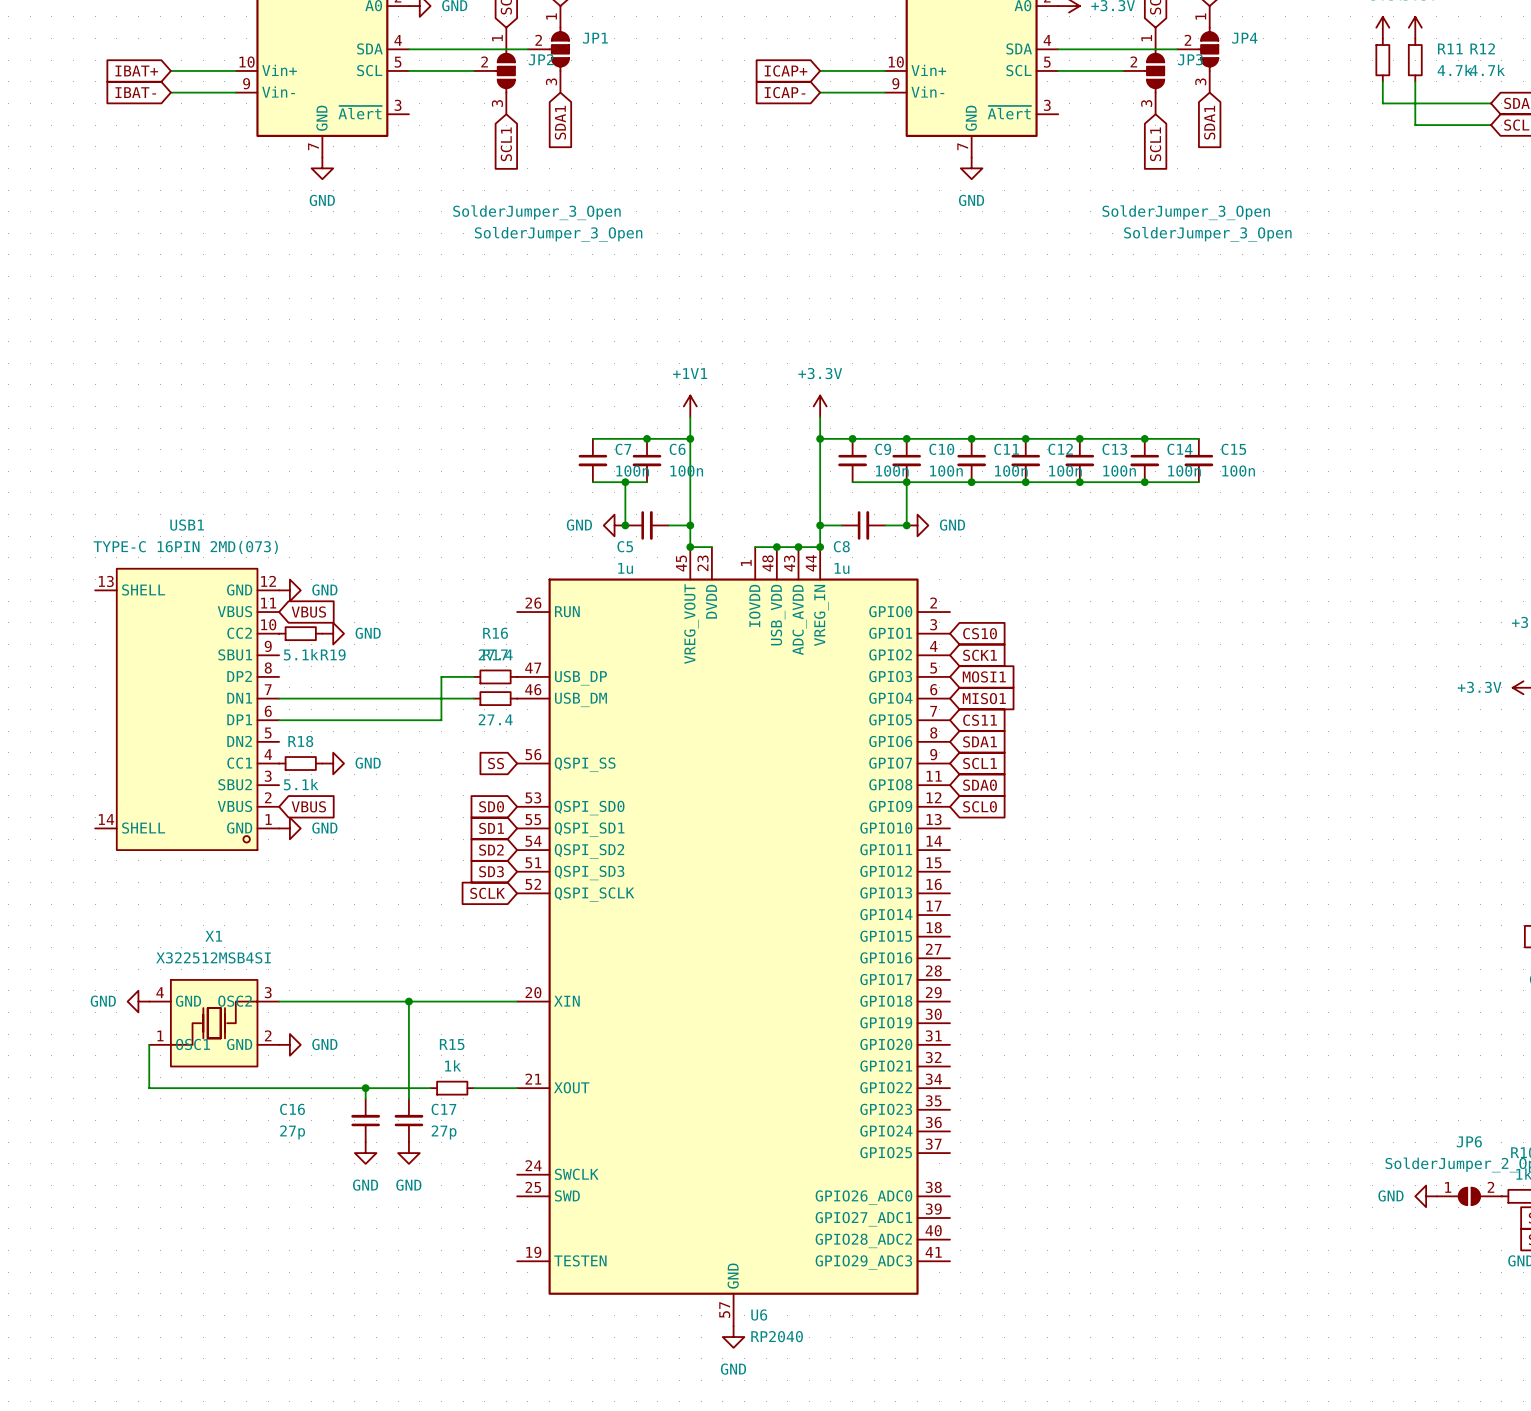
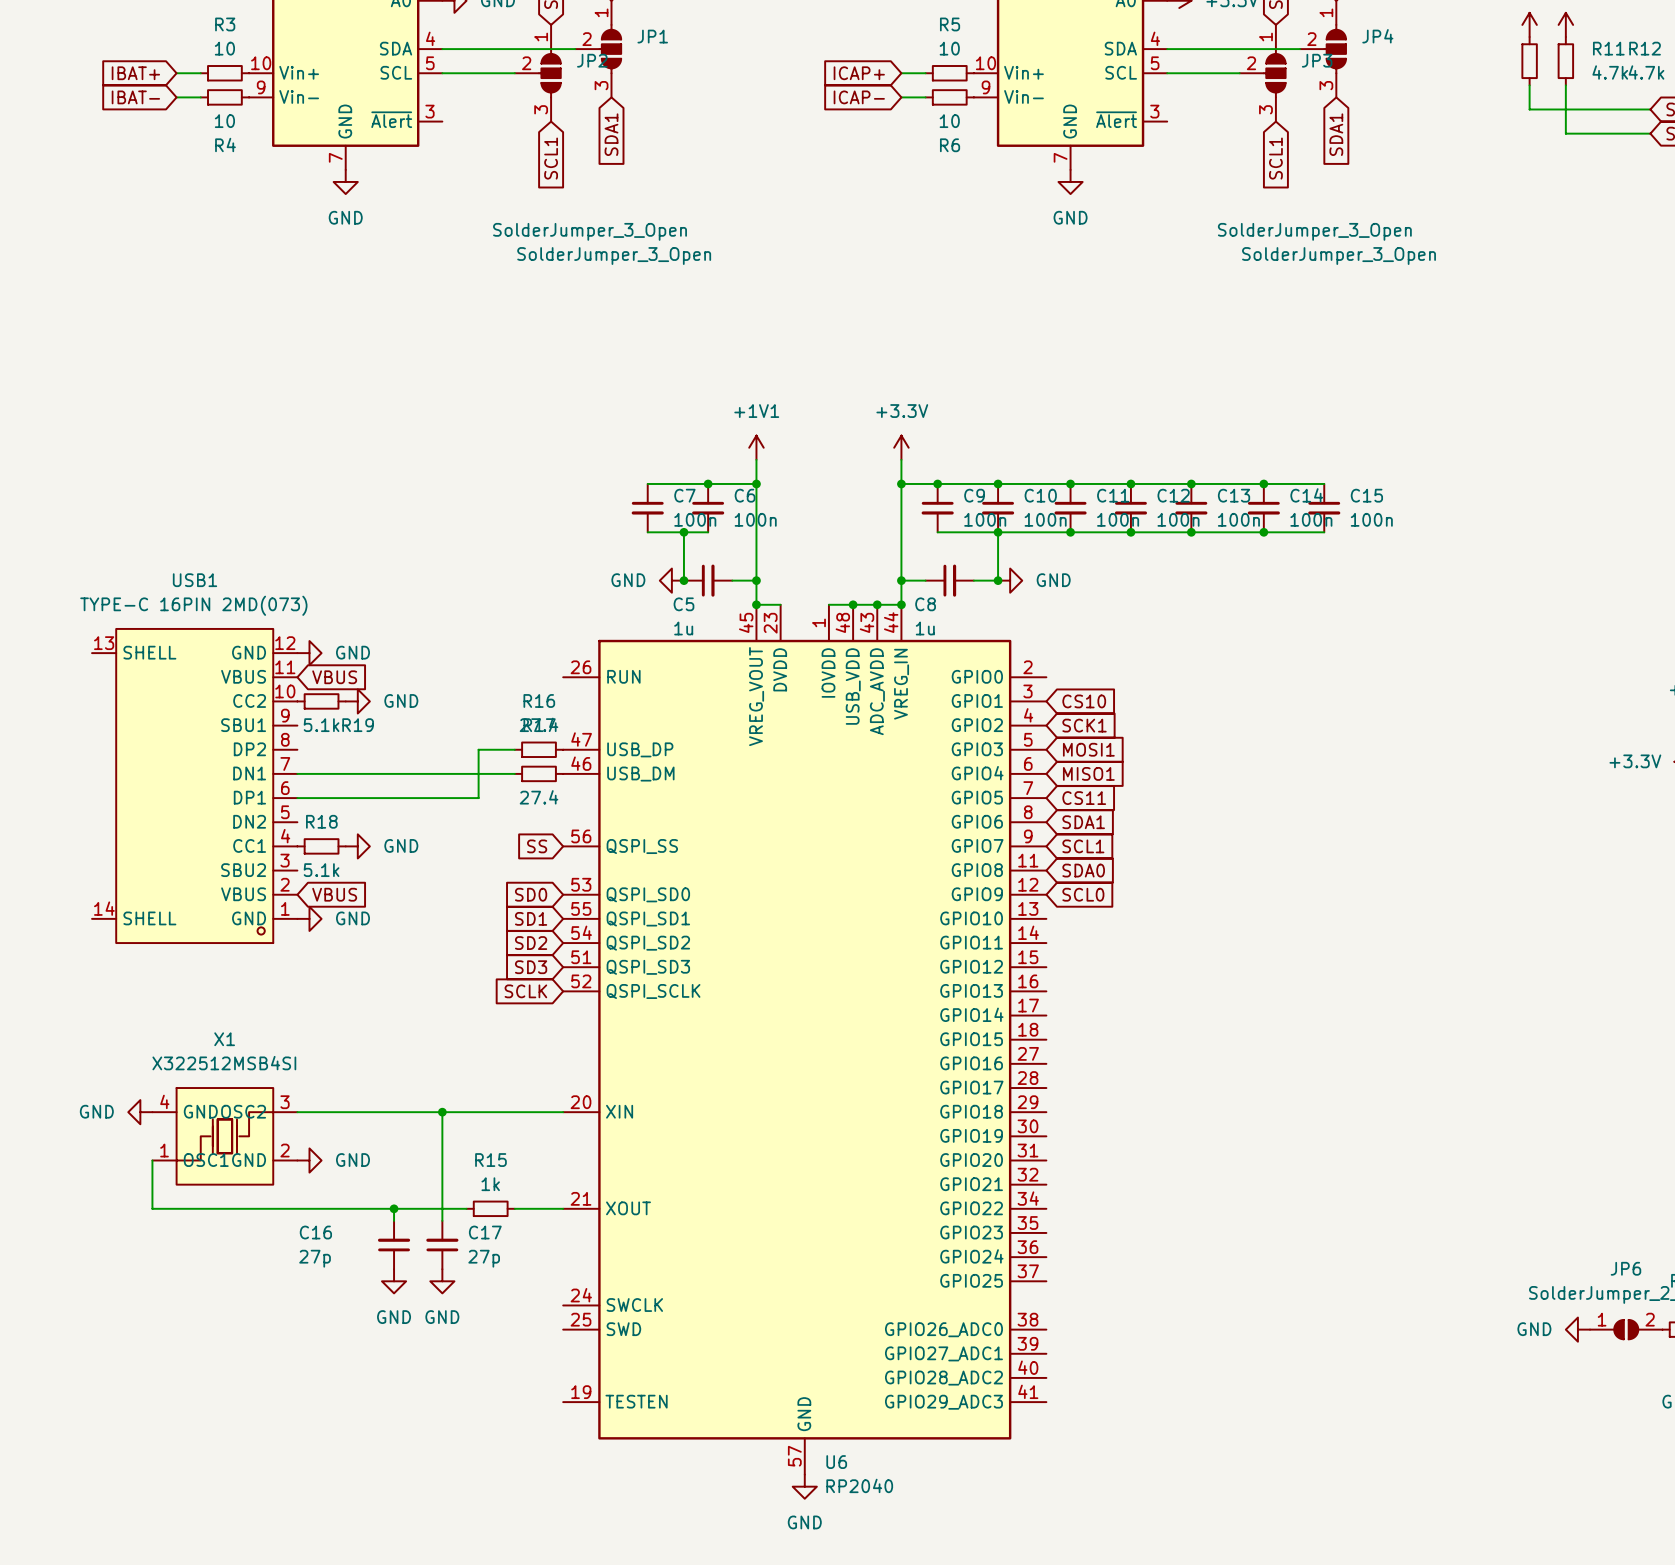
wire: (192, 70) (235, 70) -> none
R3: none -> 10 (224, 73)
wire: (841, 70) (885, 70) -> none
R5: none -> 10 (949, 73)
wire: (192, 92) (235, 92) -> none
R4: none -> 10 (224, 97)
wire: (841, 92) (885, 92) -> none
R6: none -> 10 (949, 97)

